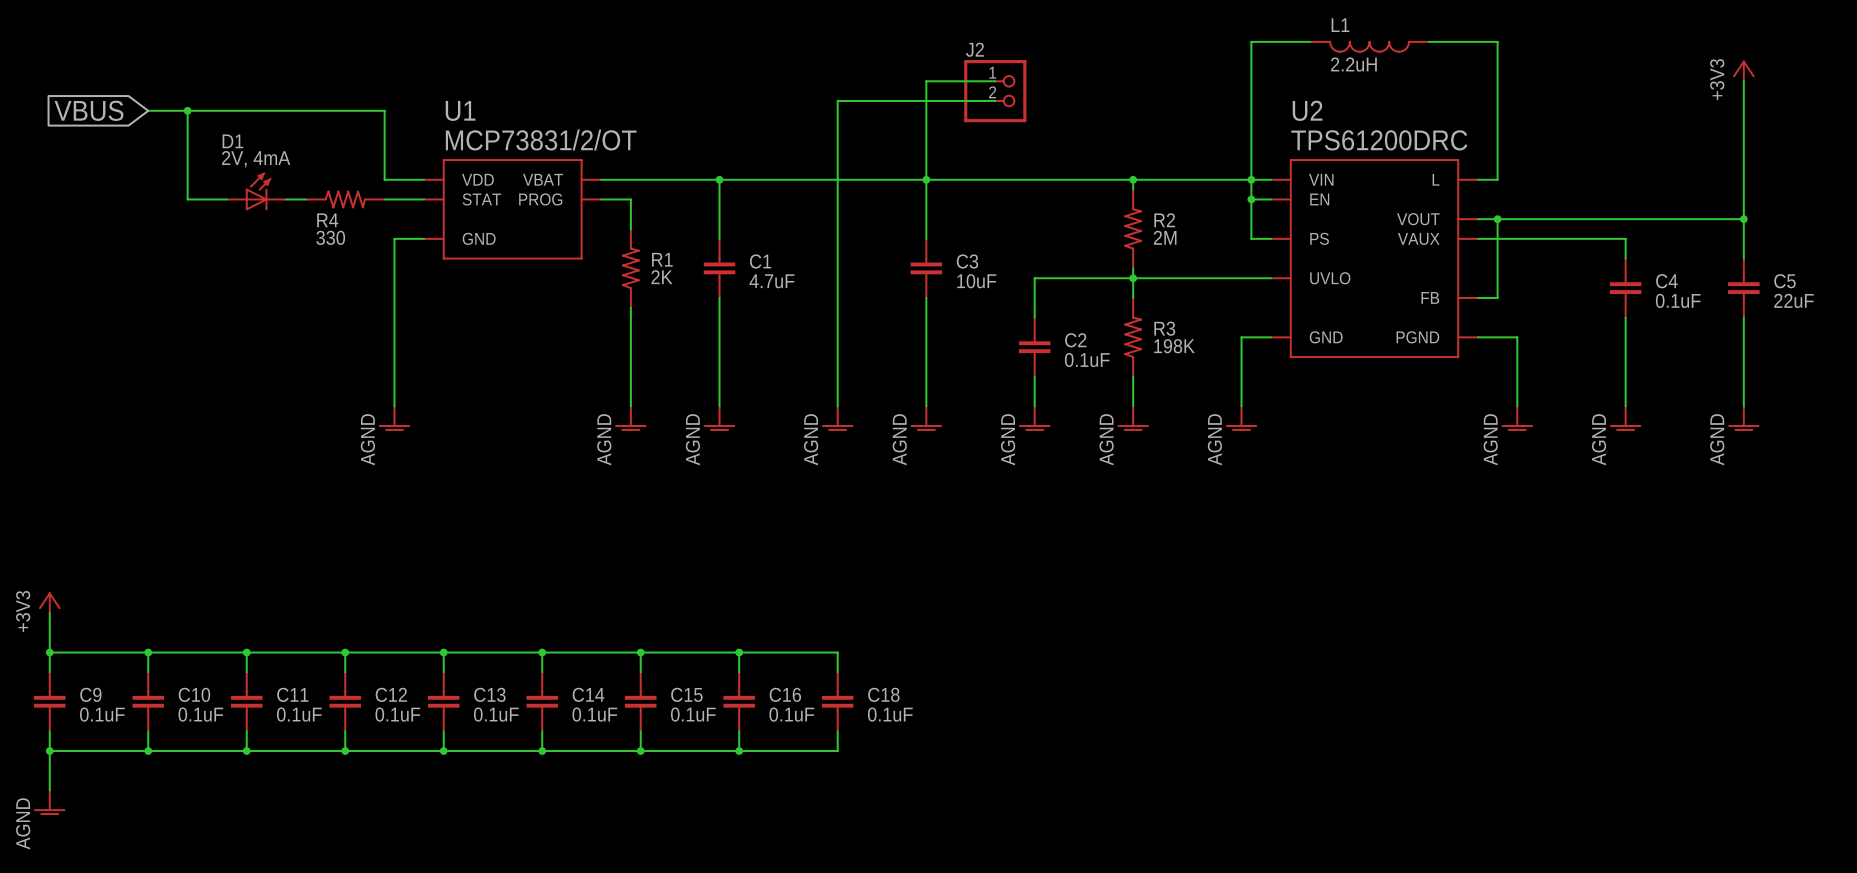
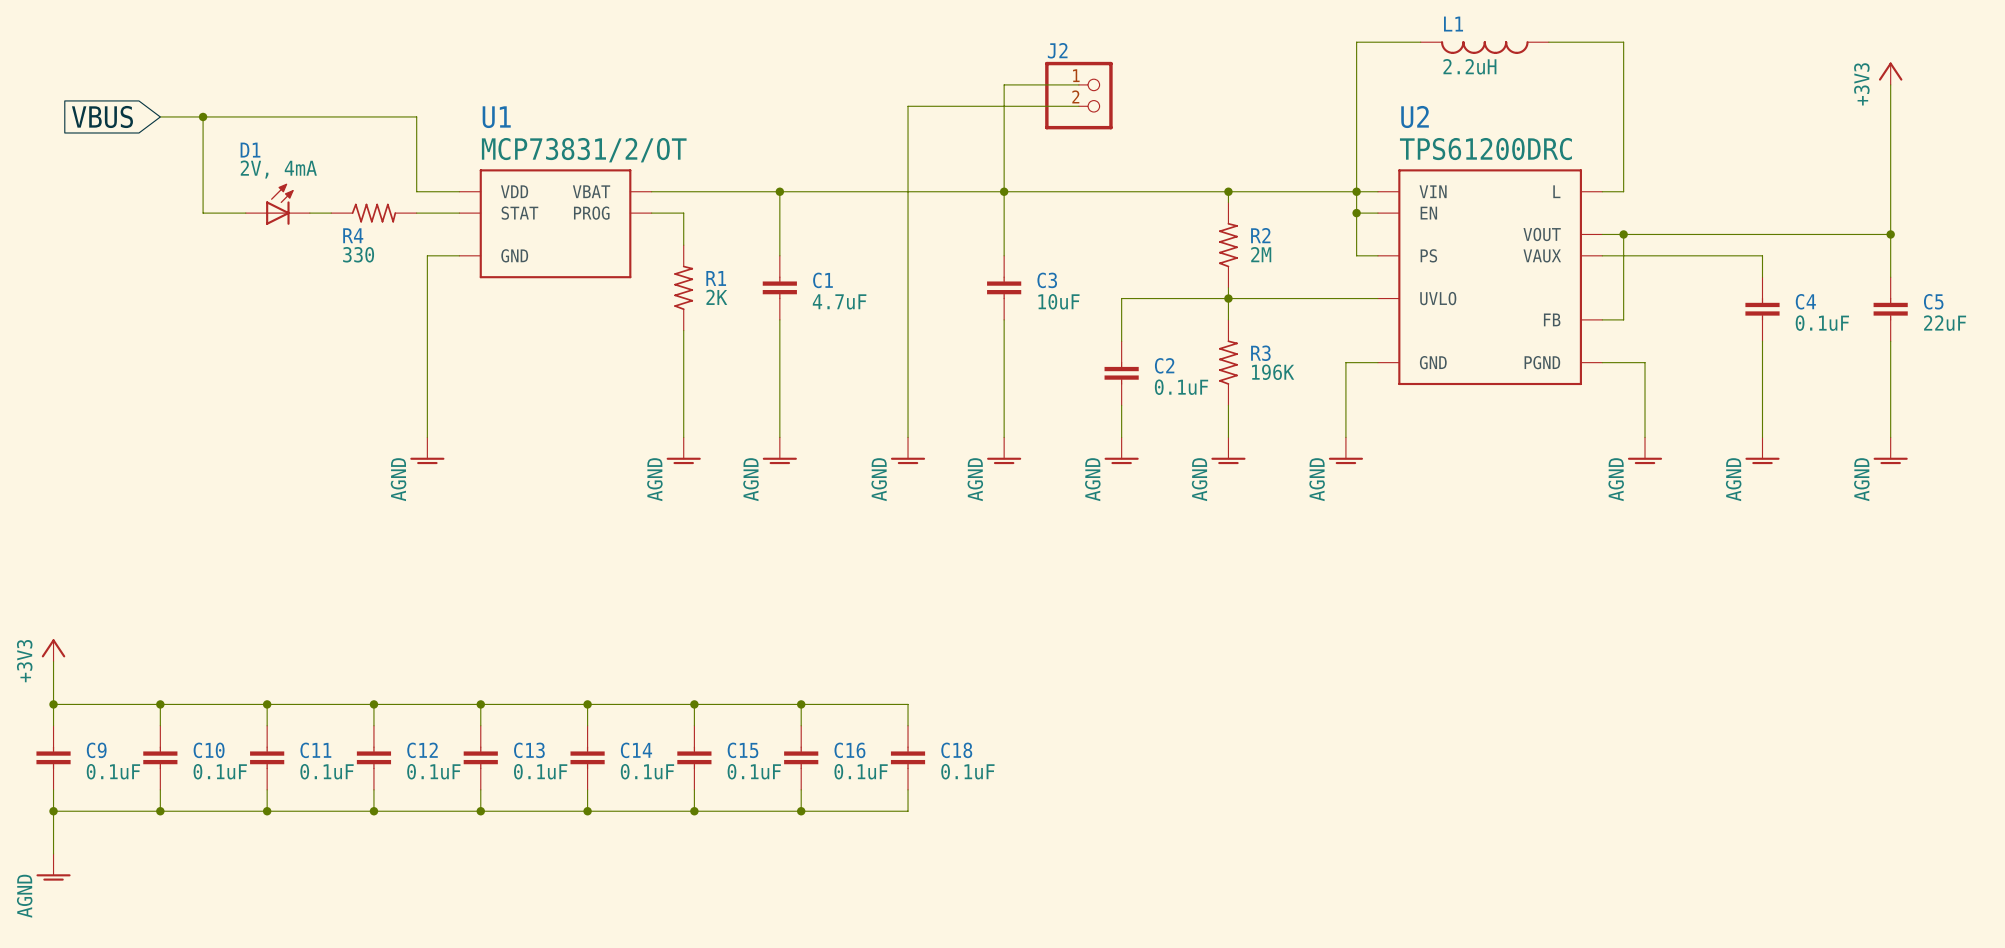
R3 value: 198K (1174, 346) -> 196K (1273, 372)

